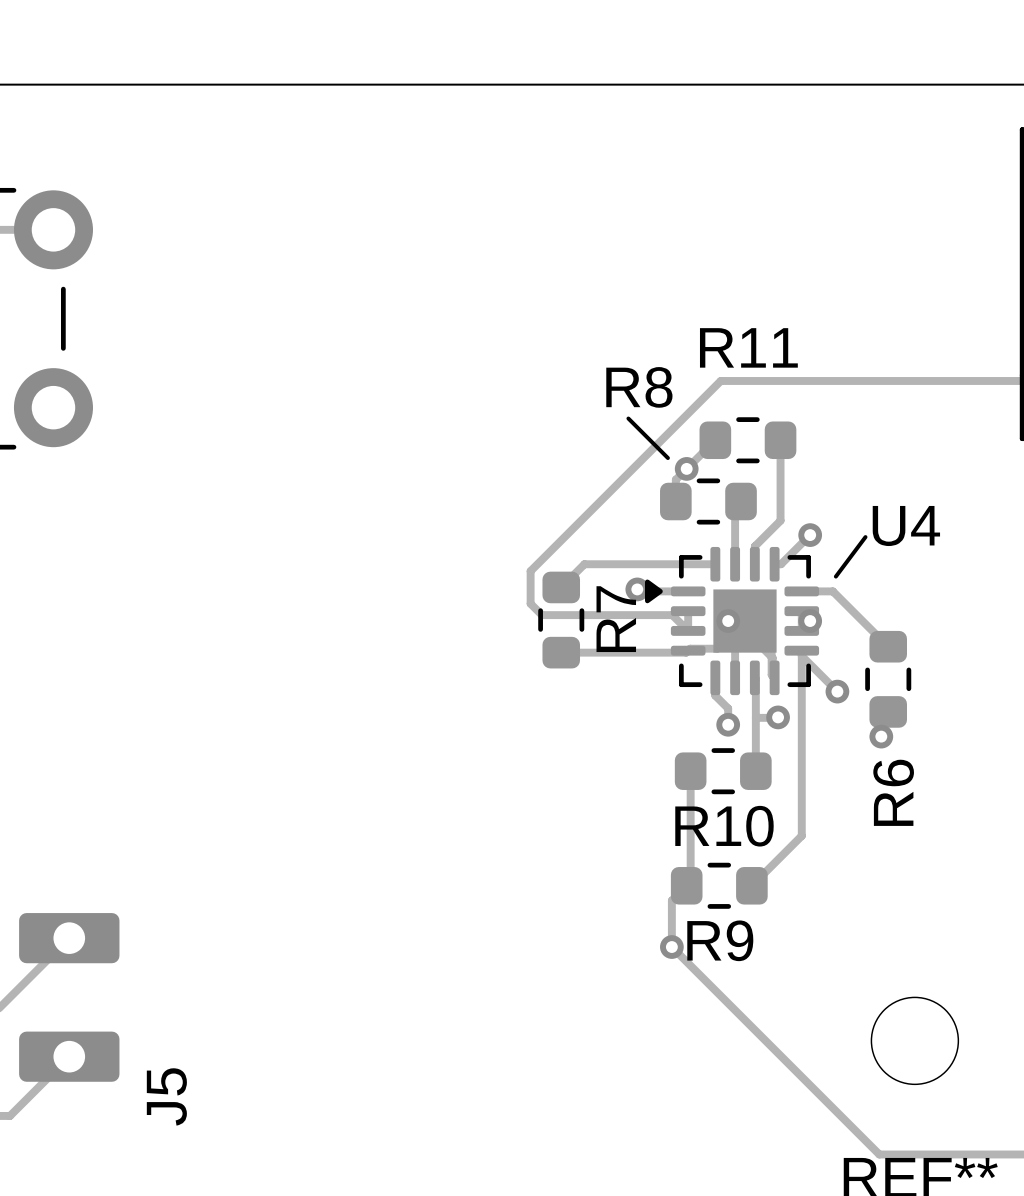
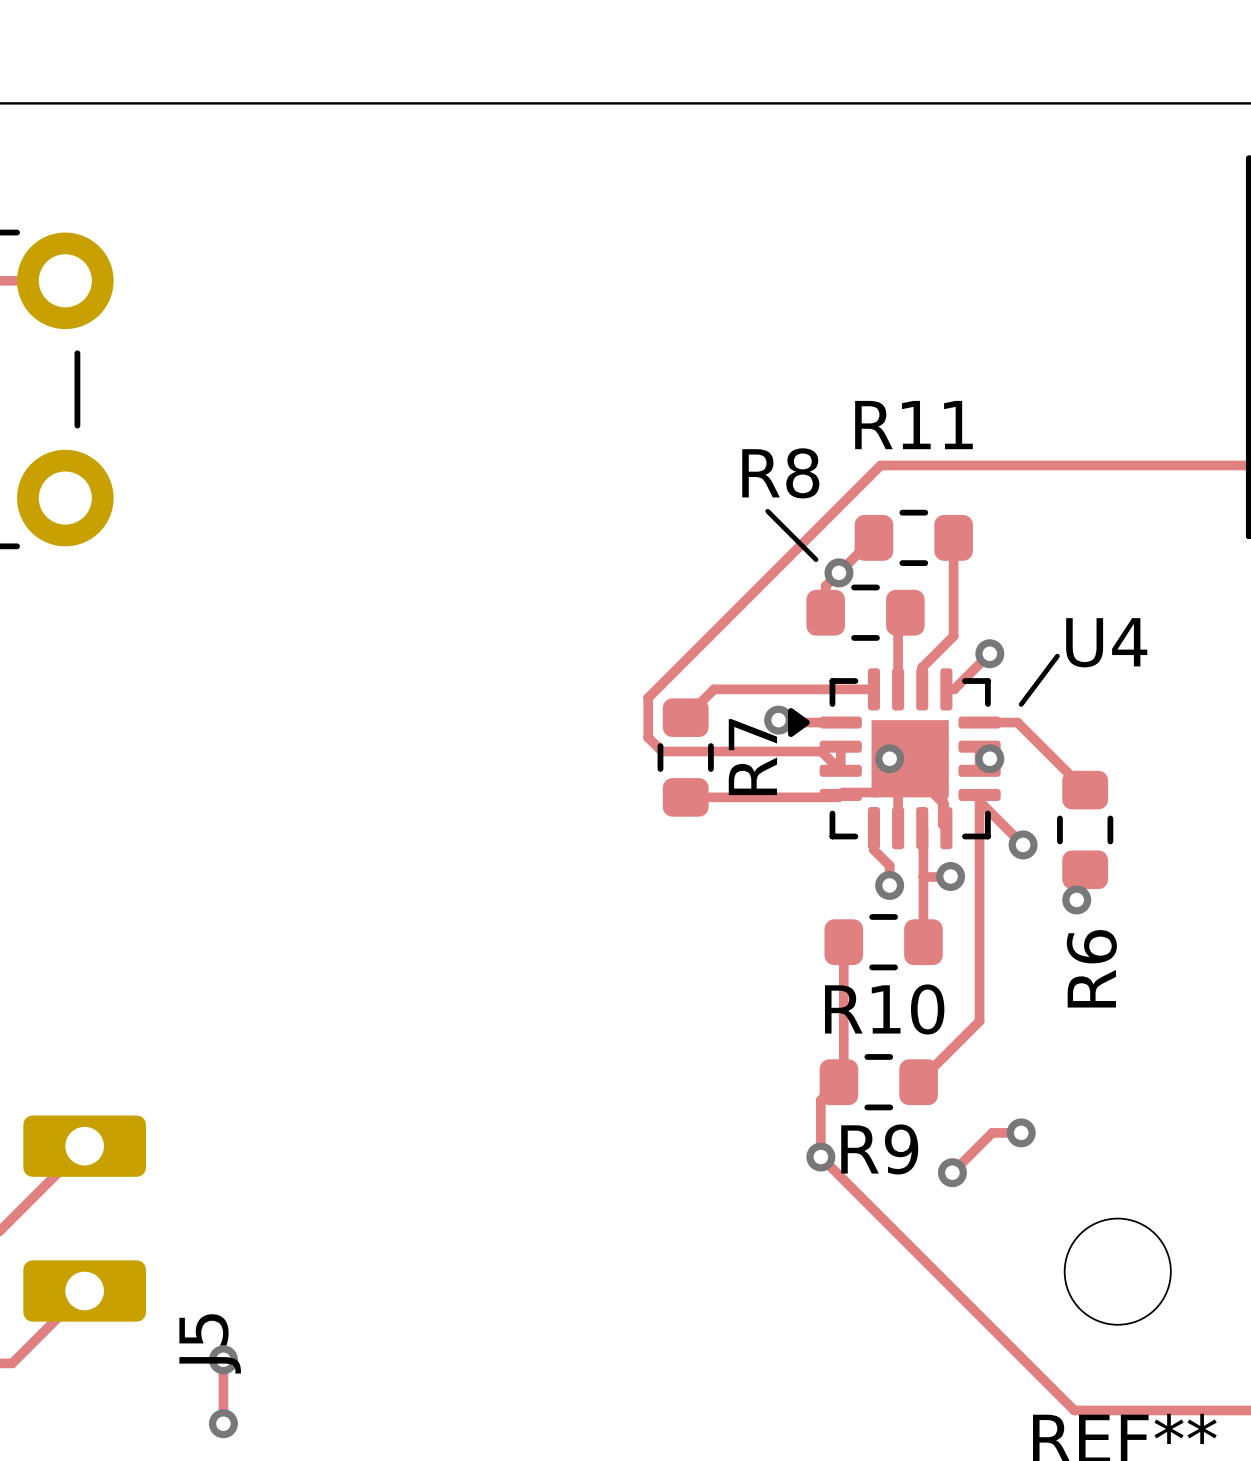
track: none -> (1021, 1132) (992, 1132) (952, 1172)
via: none -> (1021, 1132)
via: none -> (952, 1172)
track: none -> (223, 1359) (223, 1423)
via: none -> (223, 1359)
via: none -> (223, 1423)

